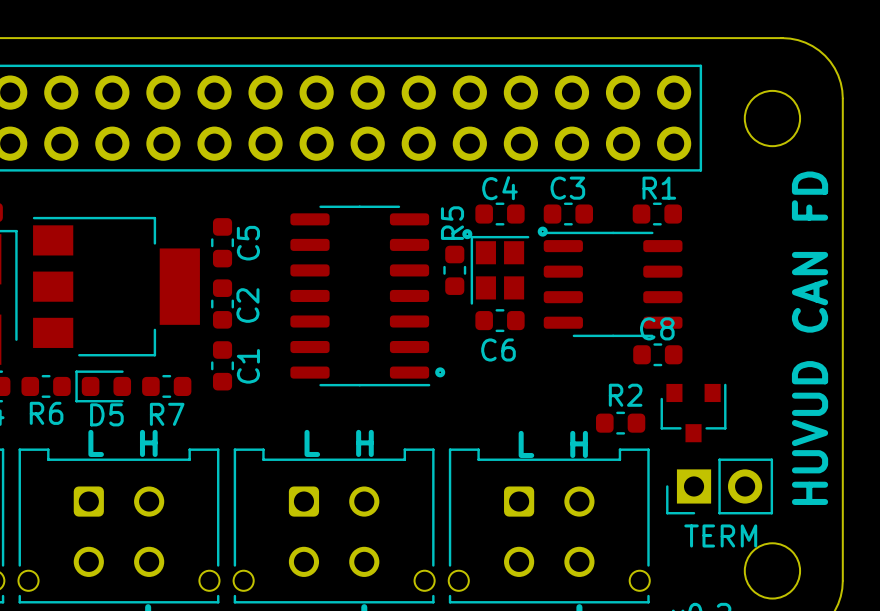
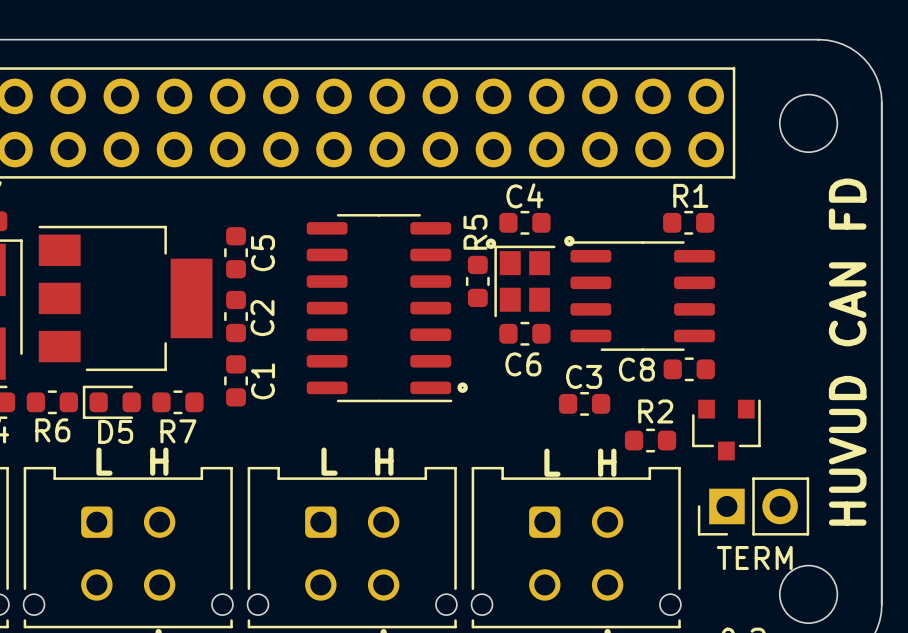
C3 position: (568, 214) -> (584, 403)
C8 name position: C8 (657, 328) -> C8 (636, 369)

